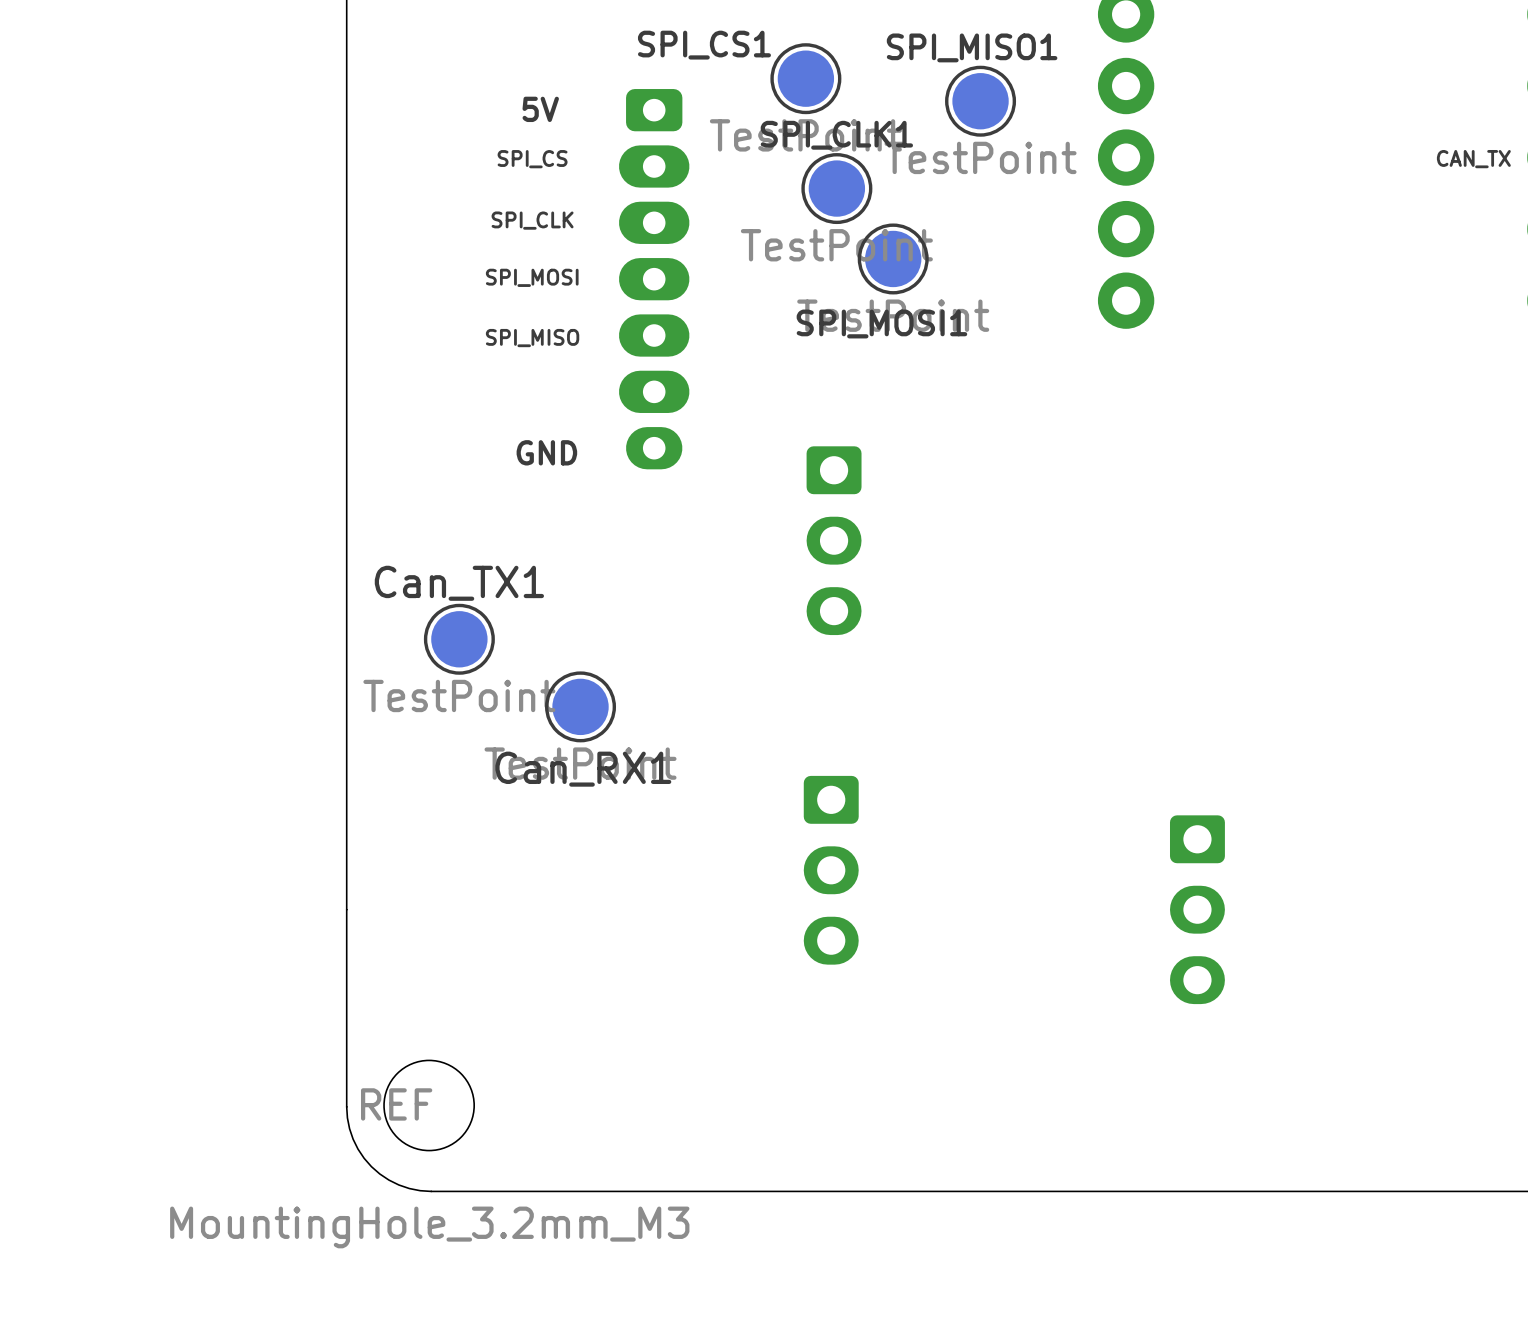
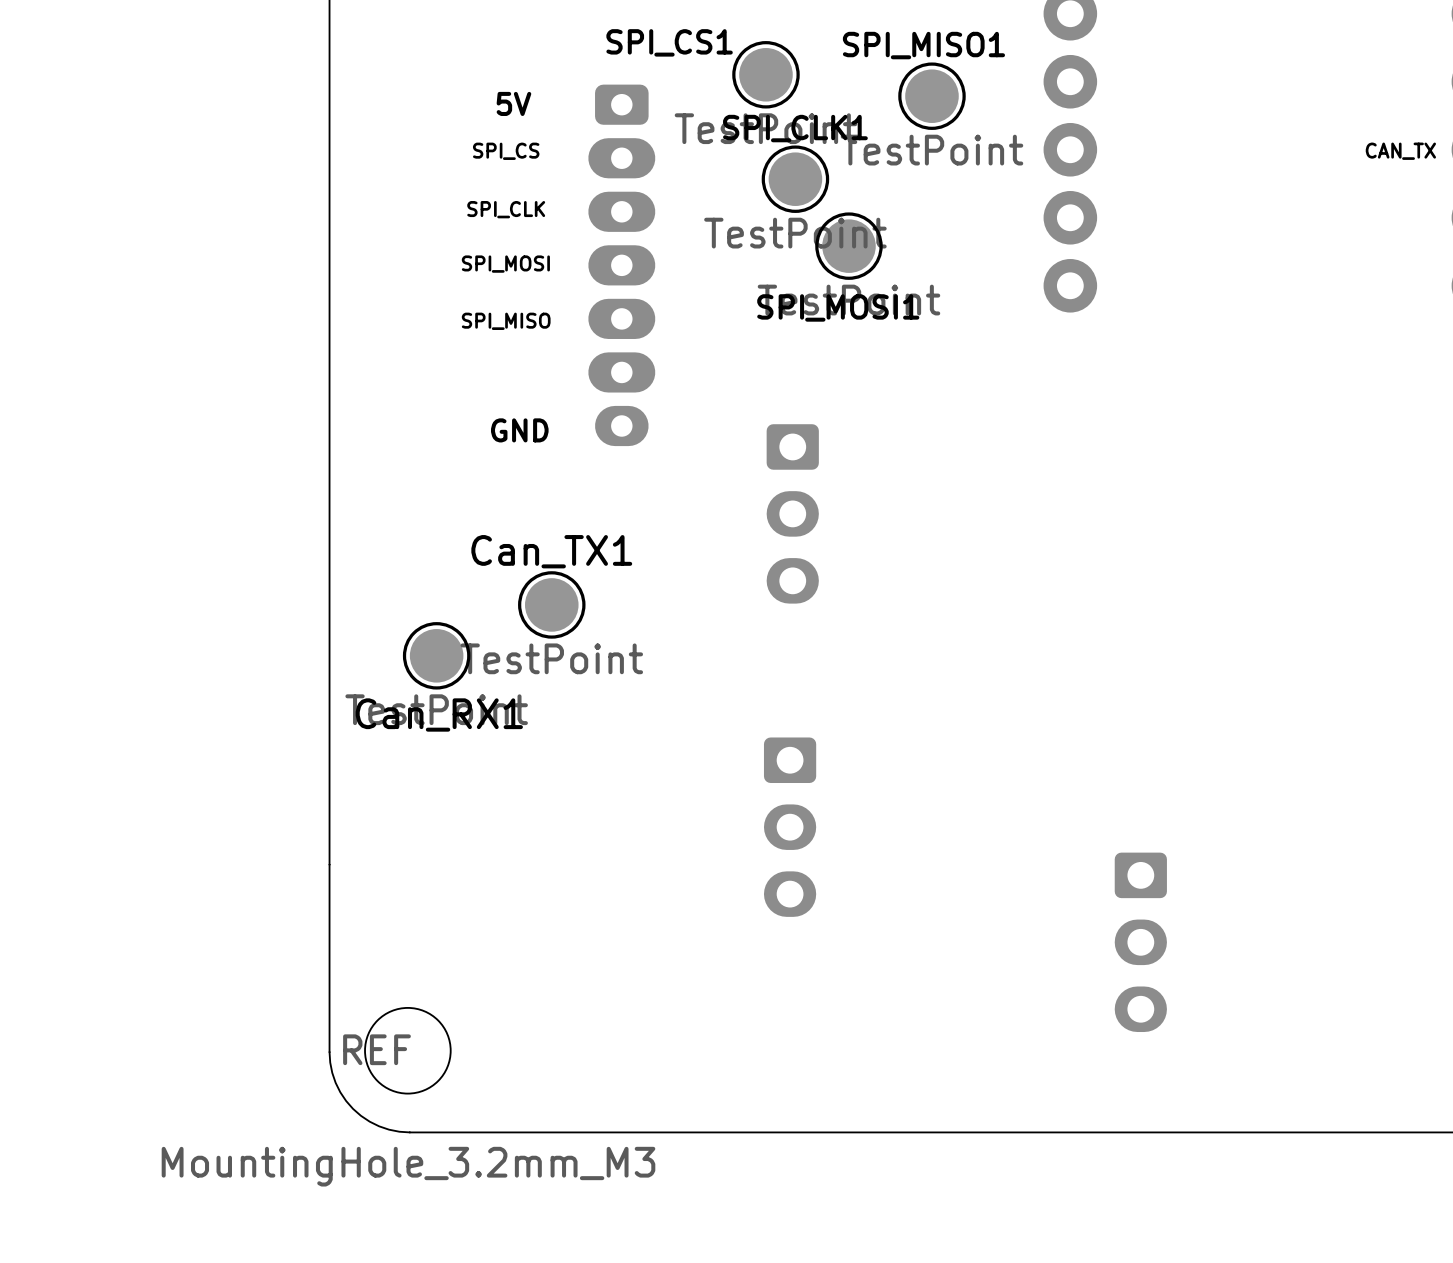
Can_TX1 position: (459, 639) -> (551, 604)
Can_RX1 position: (580, 706) -> (436, 655)
part position: (1197, 909) -> (1140, 942)

